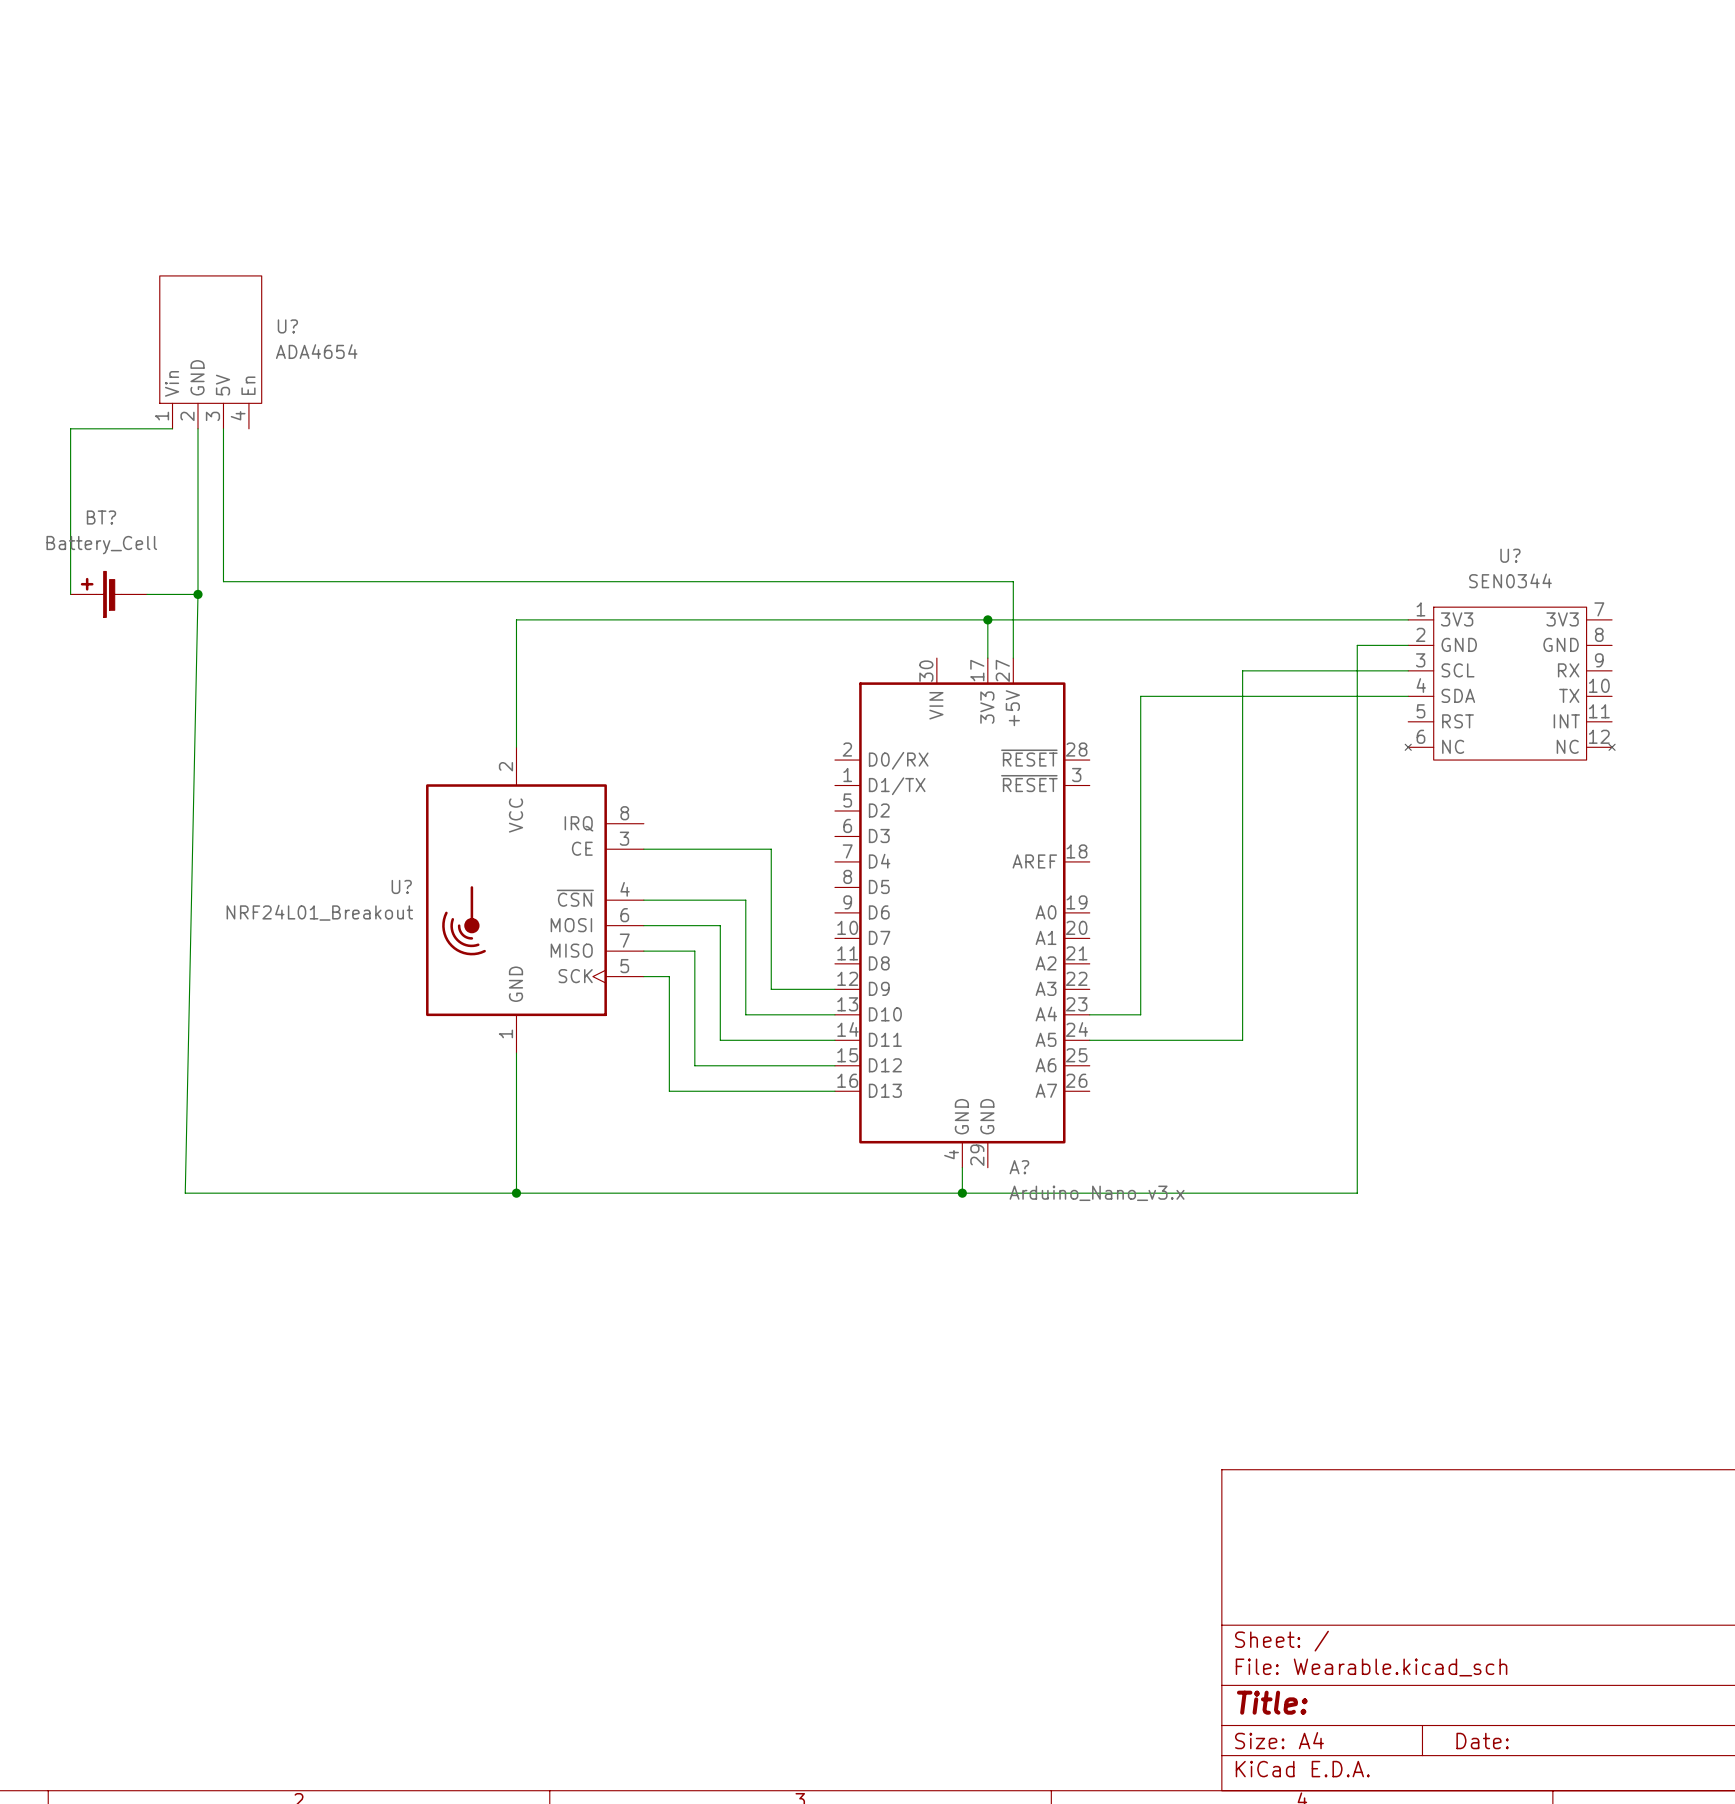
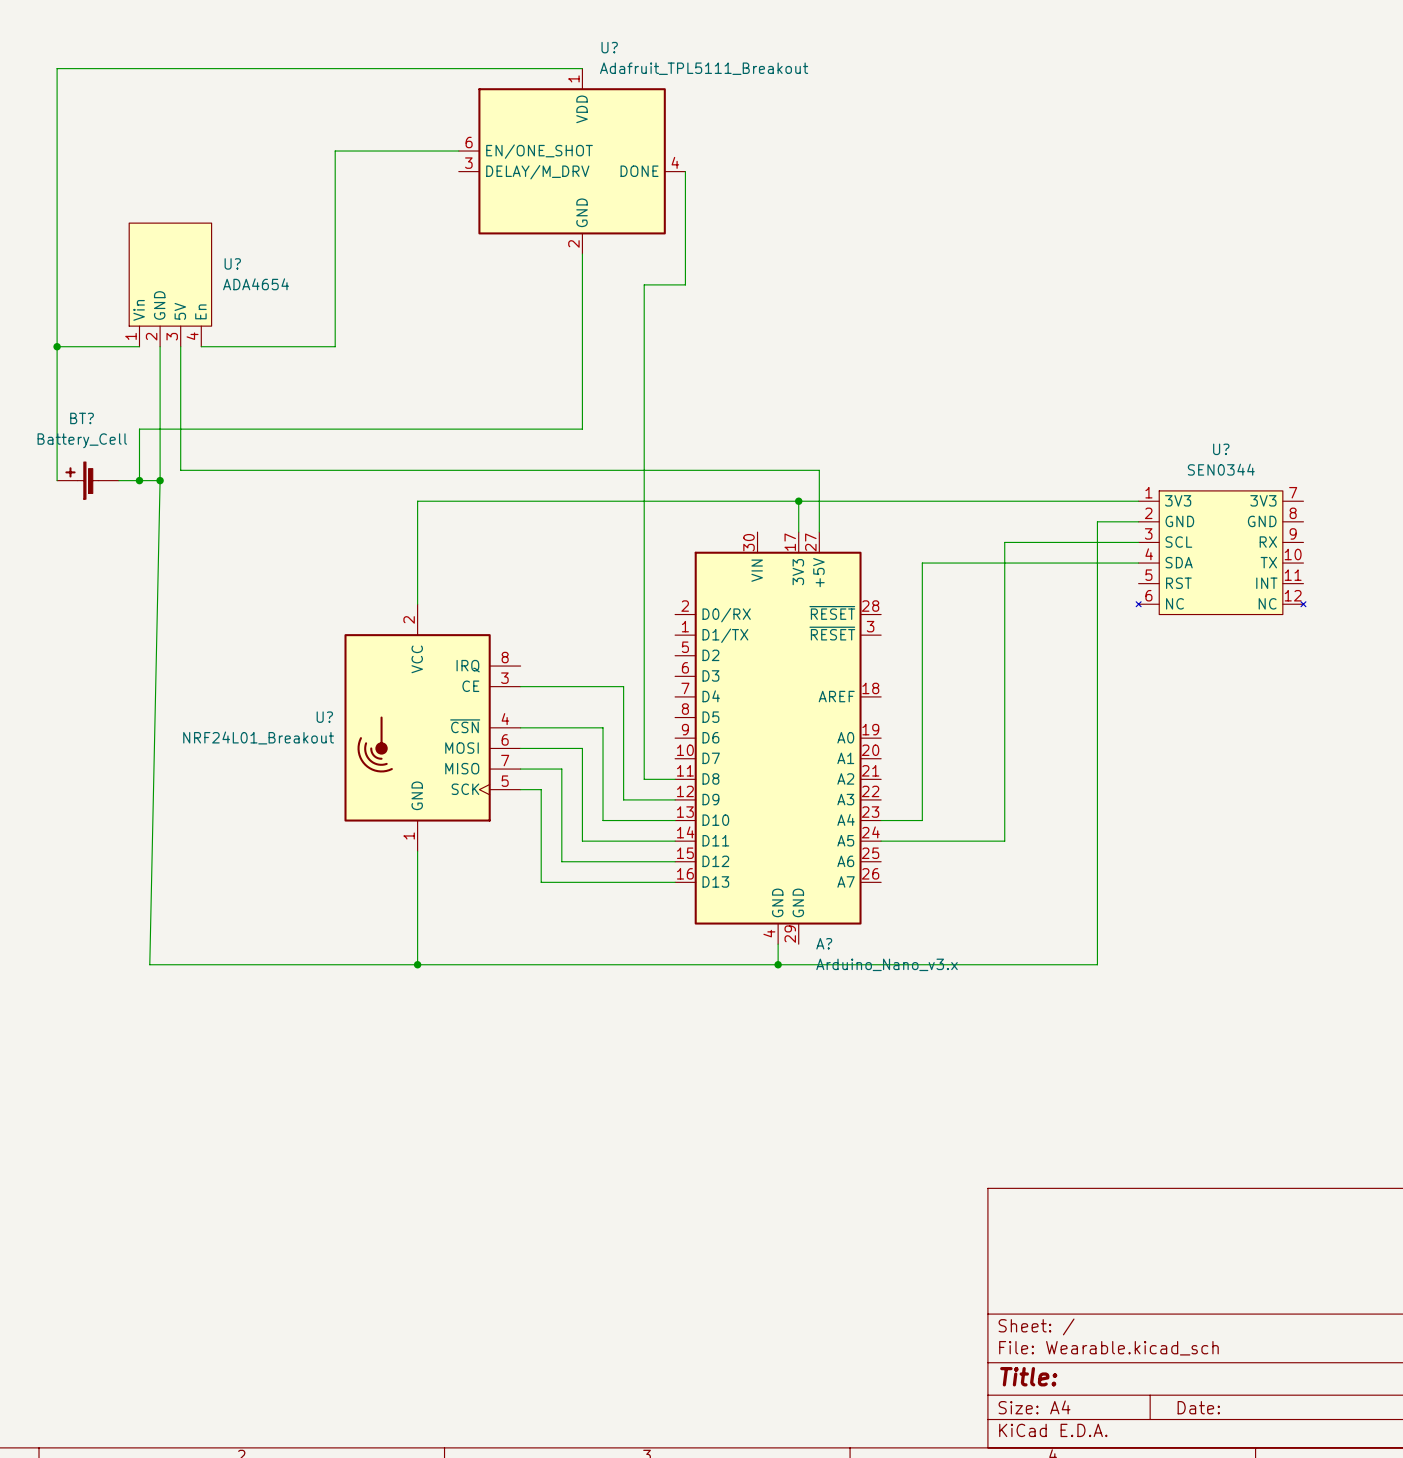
wire: none -> (582, 68) (57, 68) (57, 346)
wire: none -> (458, 151) (335, 151) (335, 346) (201, 346)
U?: none -> Adafruit_TPL5111_Breakout (572, 161)
wire: none -> (685, 171) (685, 284) (644, 284) (644, 779) (675, 779)
wire: none -> (582, 254) (582, 429) (139, 429) (139, 480)
junction: none -> (57, 346)
junction: none -> (139, 480)

